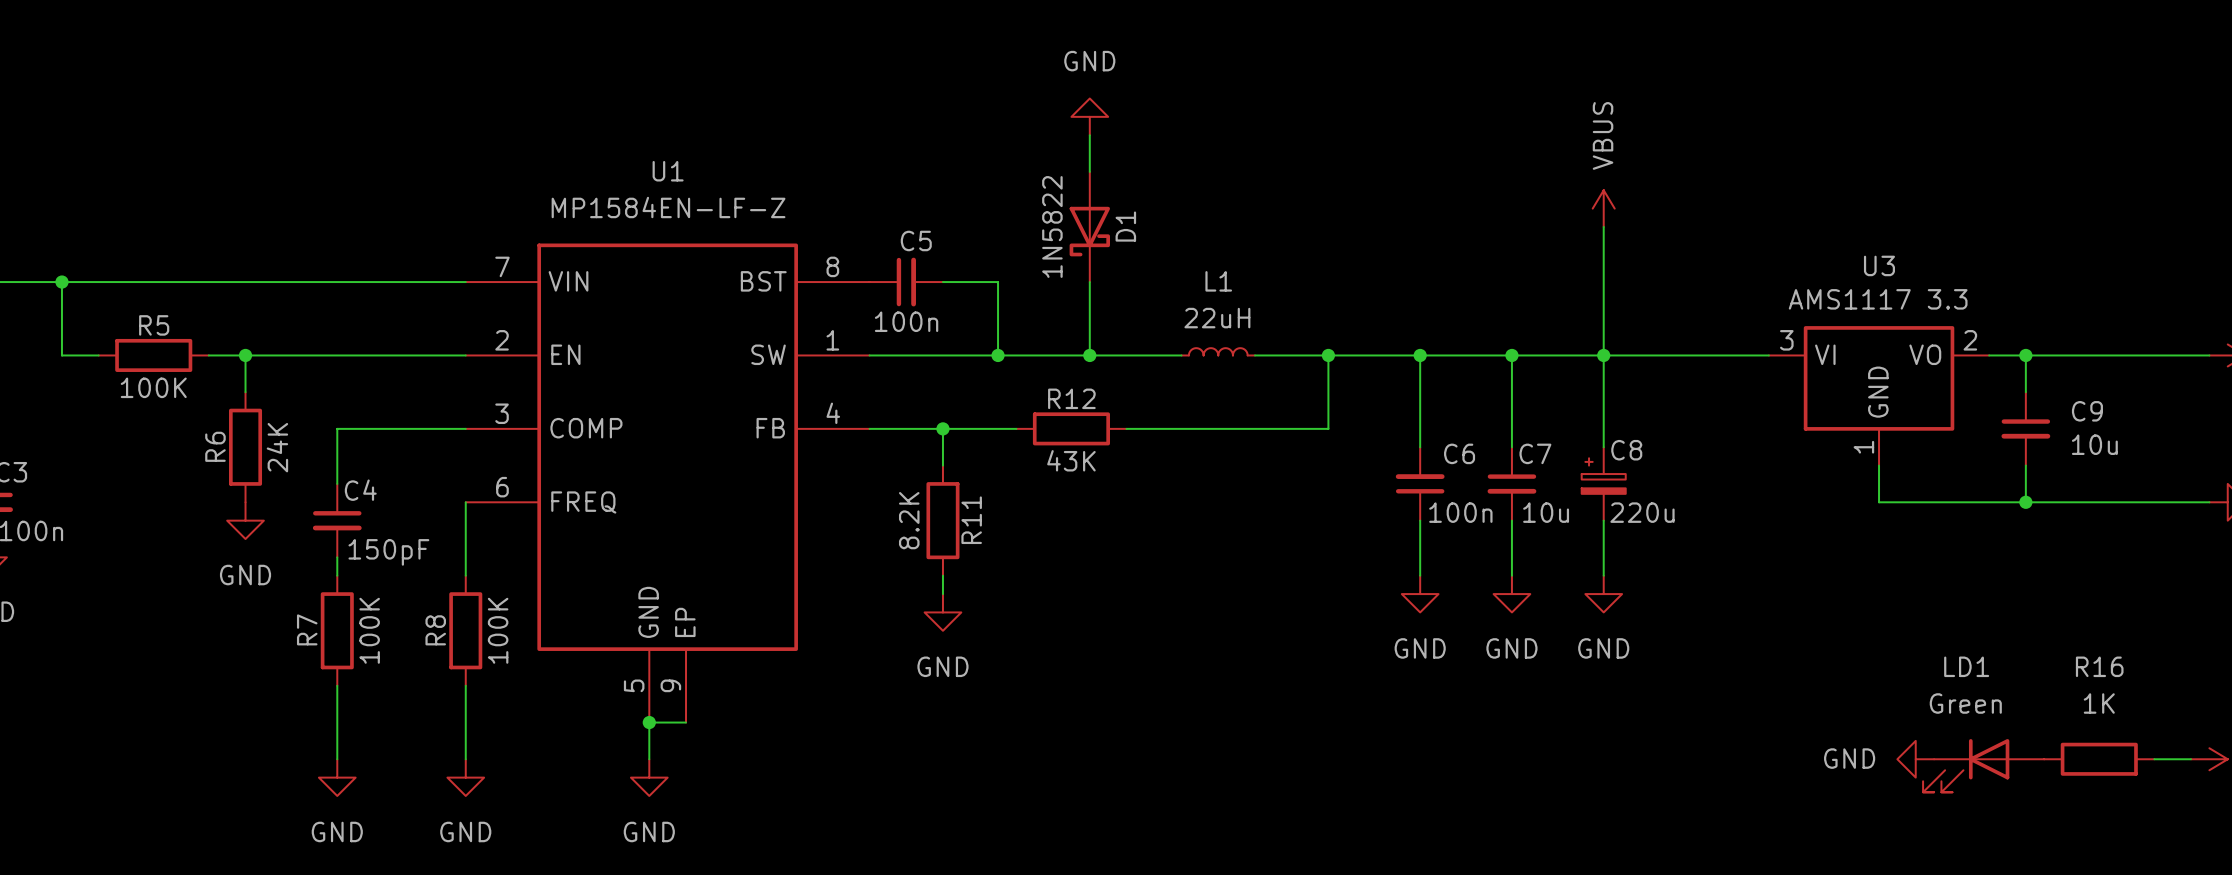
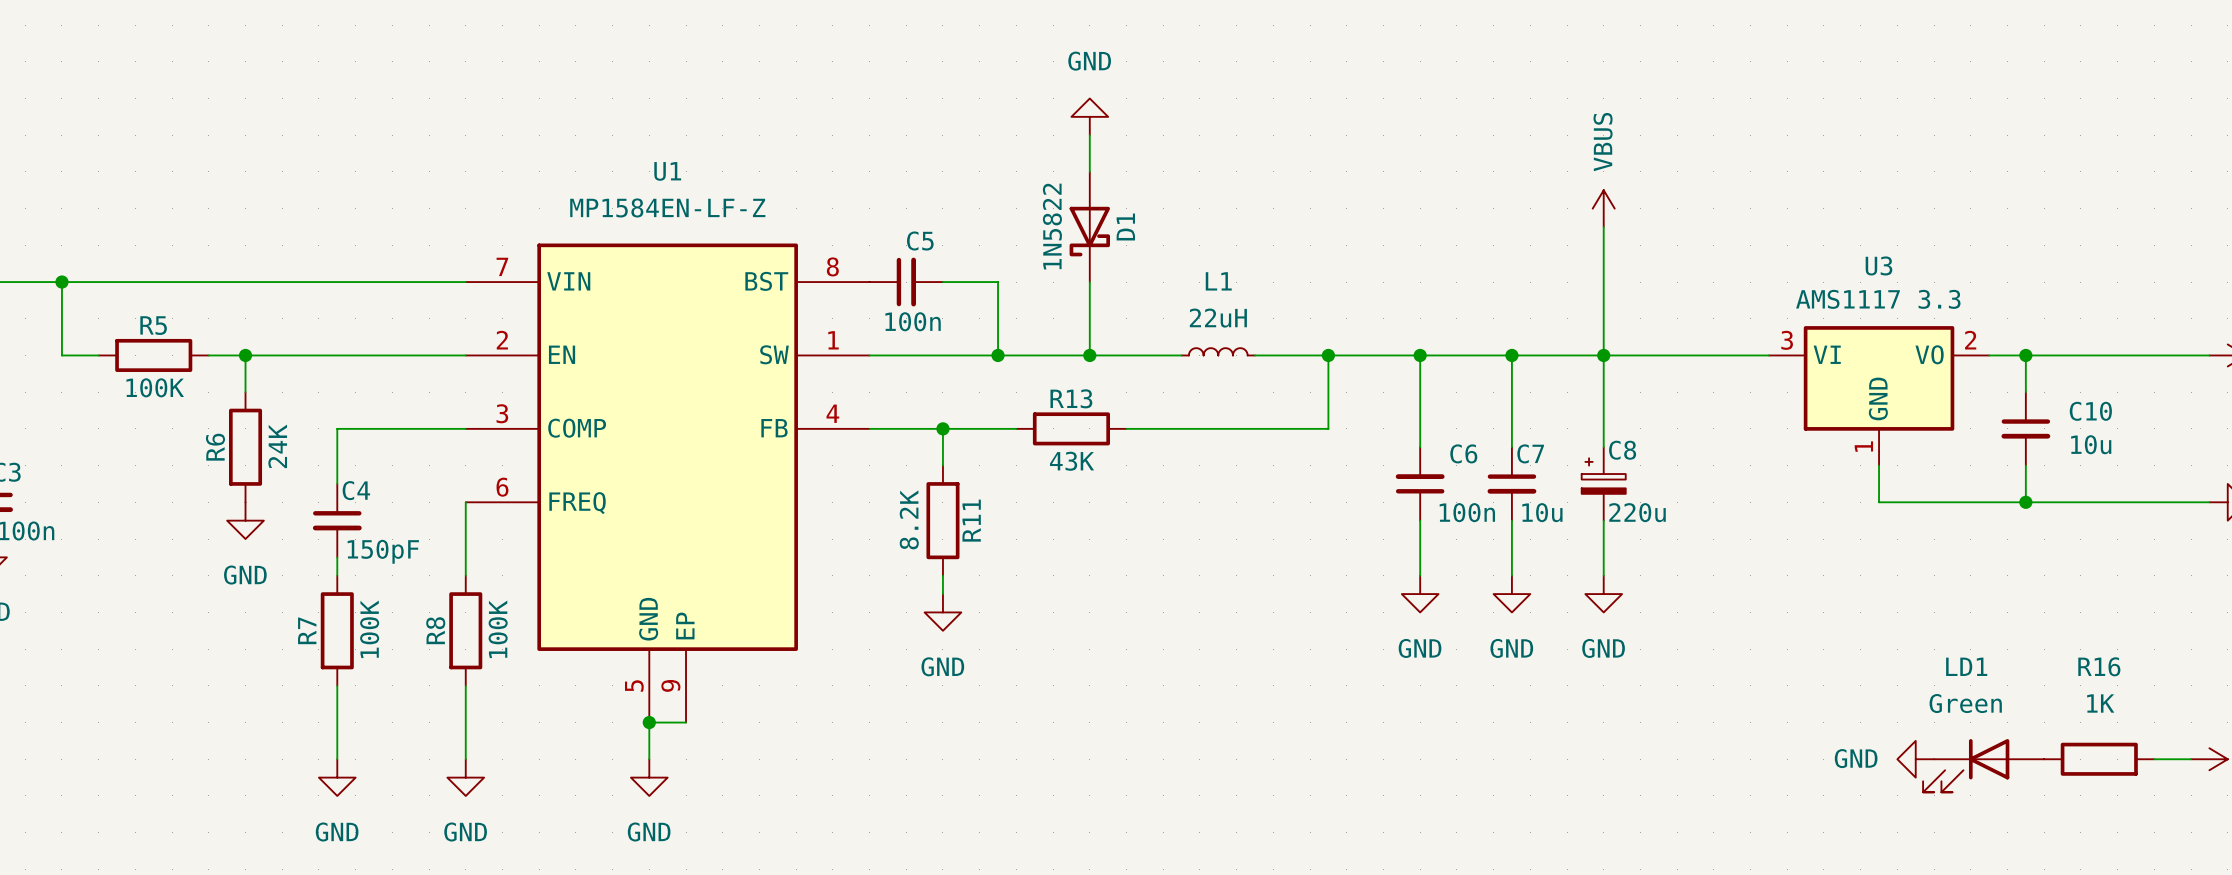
R12 name: R12 (1071, 398) -> R13 (1071, 398)
C9 name: C9 (2087, 411) -> C10 (2090, 411)

